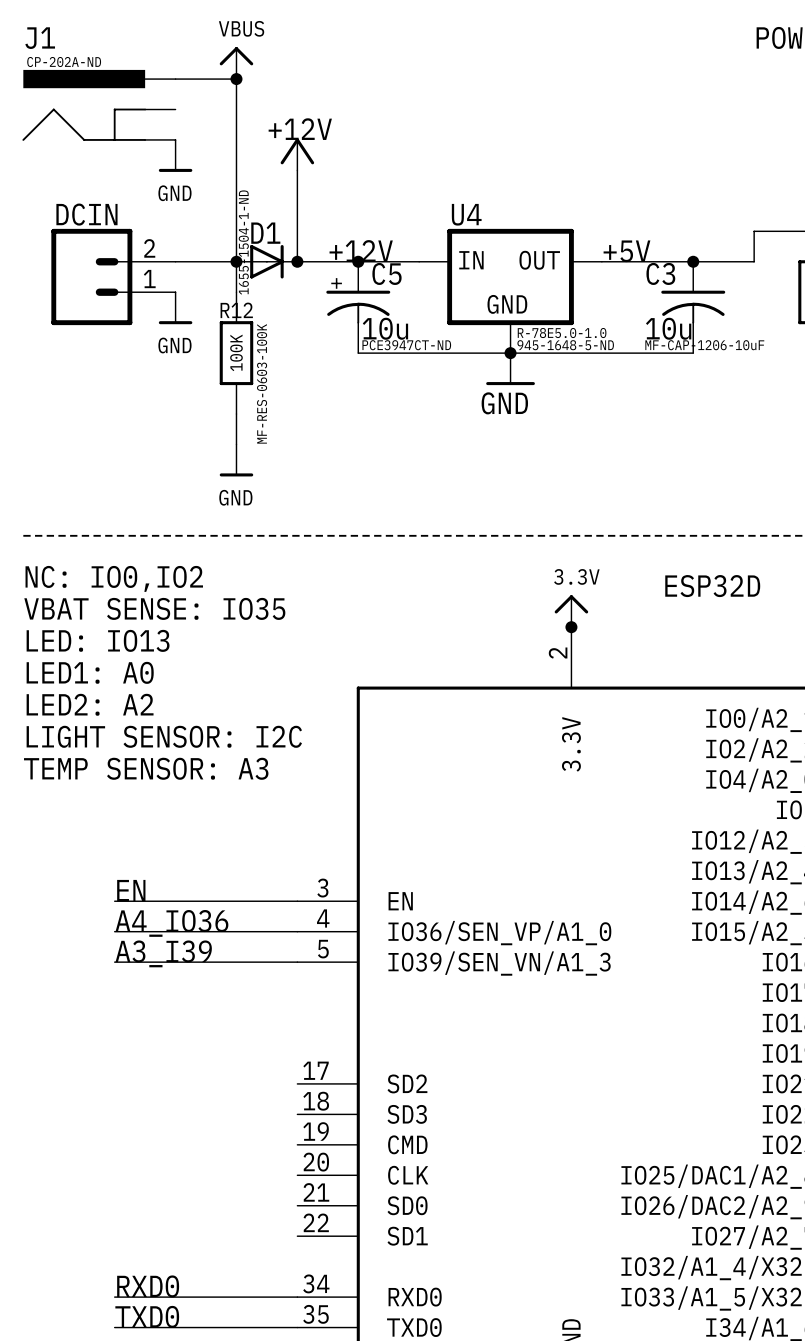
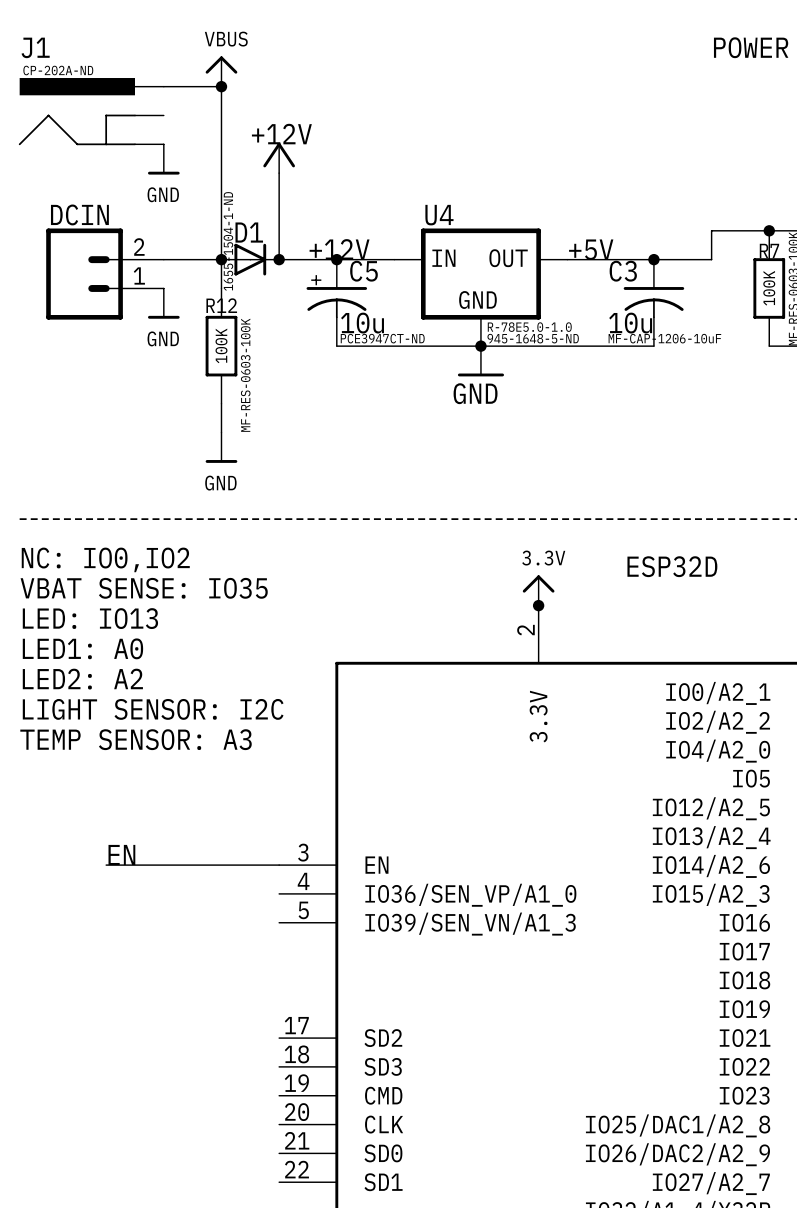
label: A4_IO36 (171, 923) -> none
wire: (114, 931) (297, 931) -> none
label: A3_I39 (163, 953) -> none
wire: (114, 962) (297, 962) -> none

